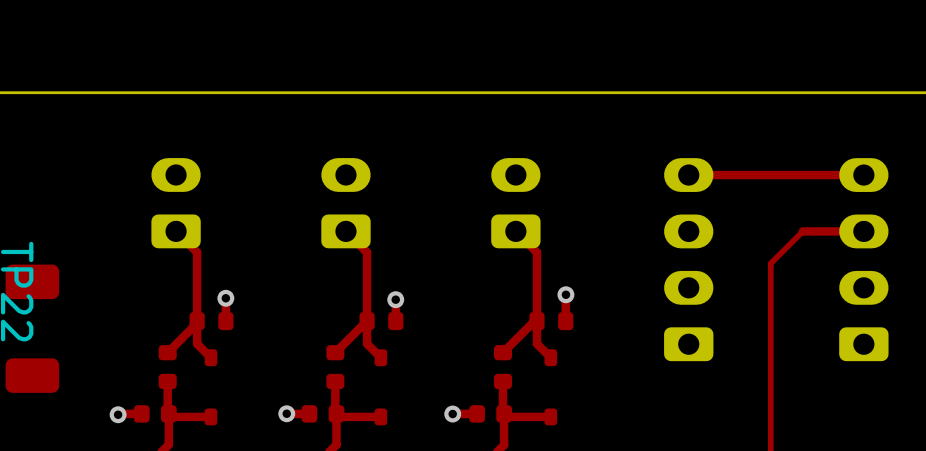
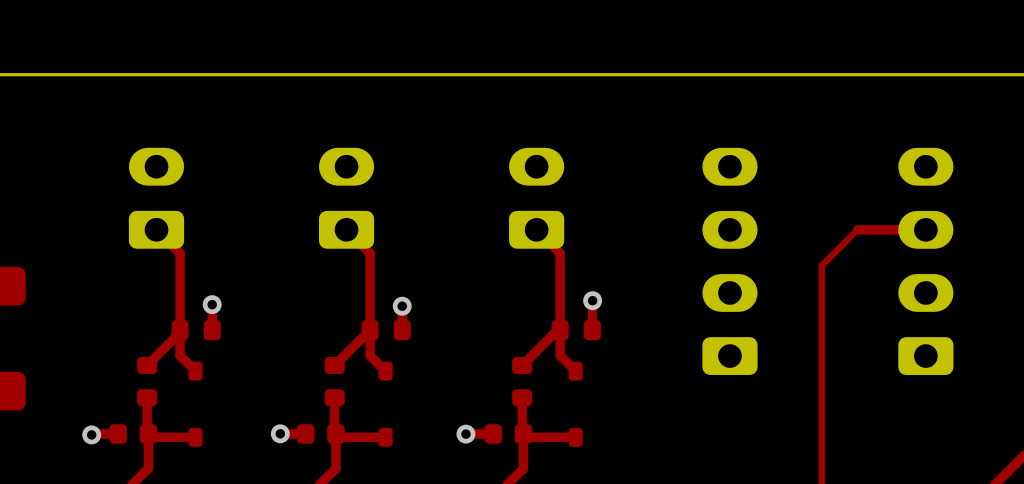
top track: (863, 175) (688, 175) -> none

